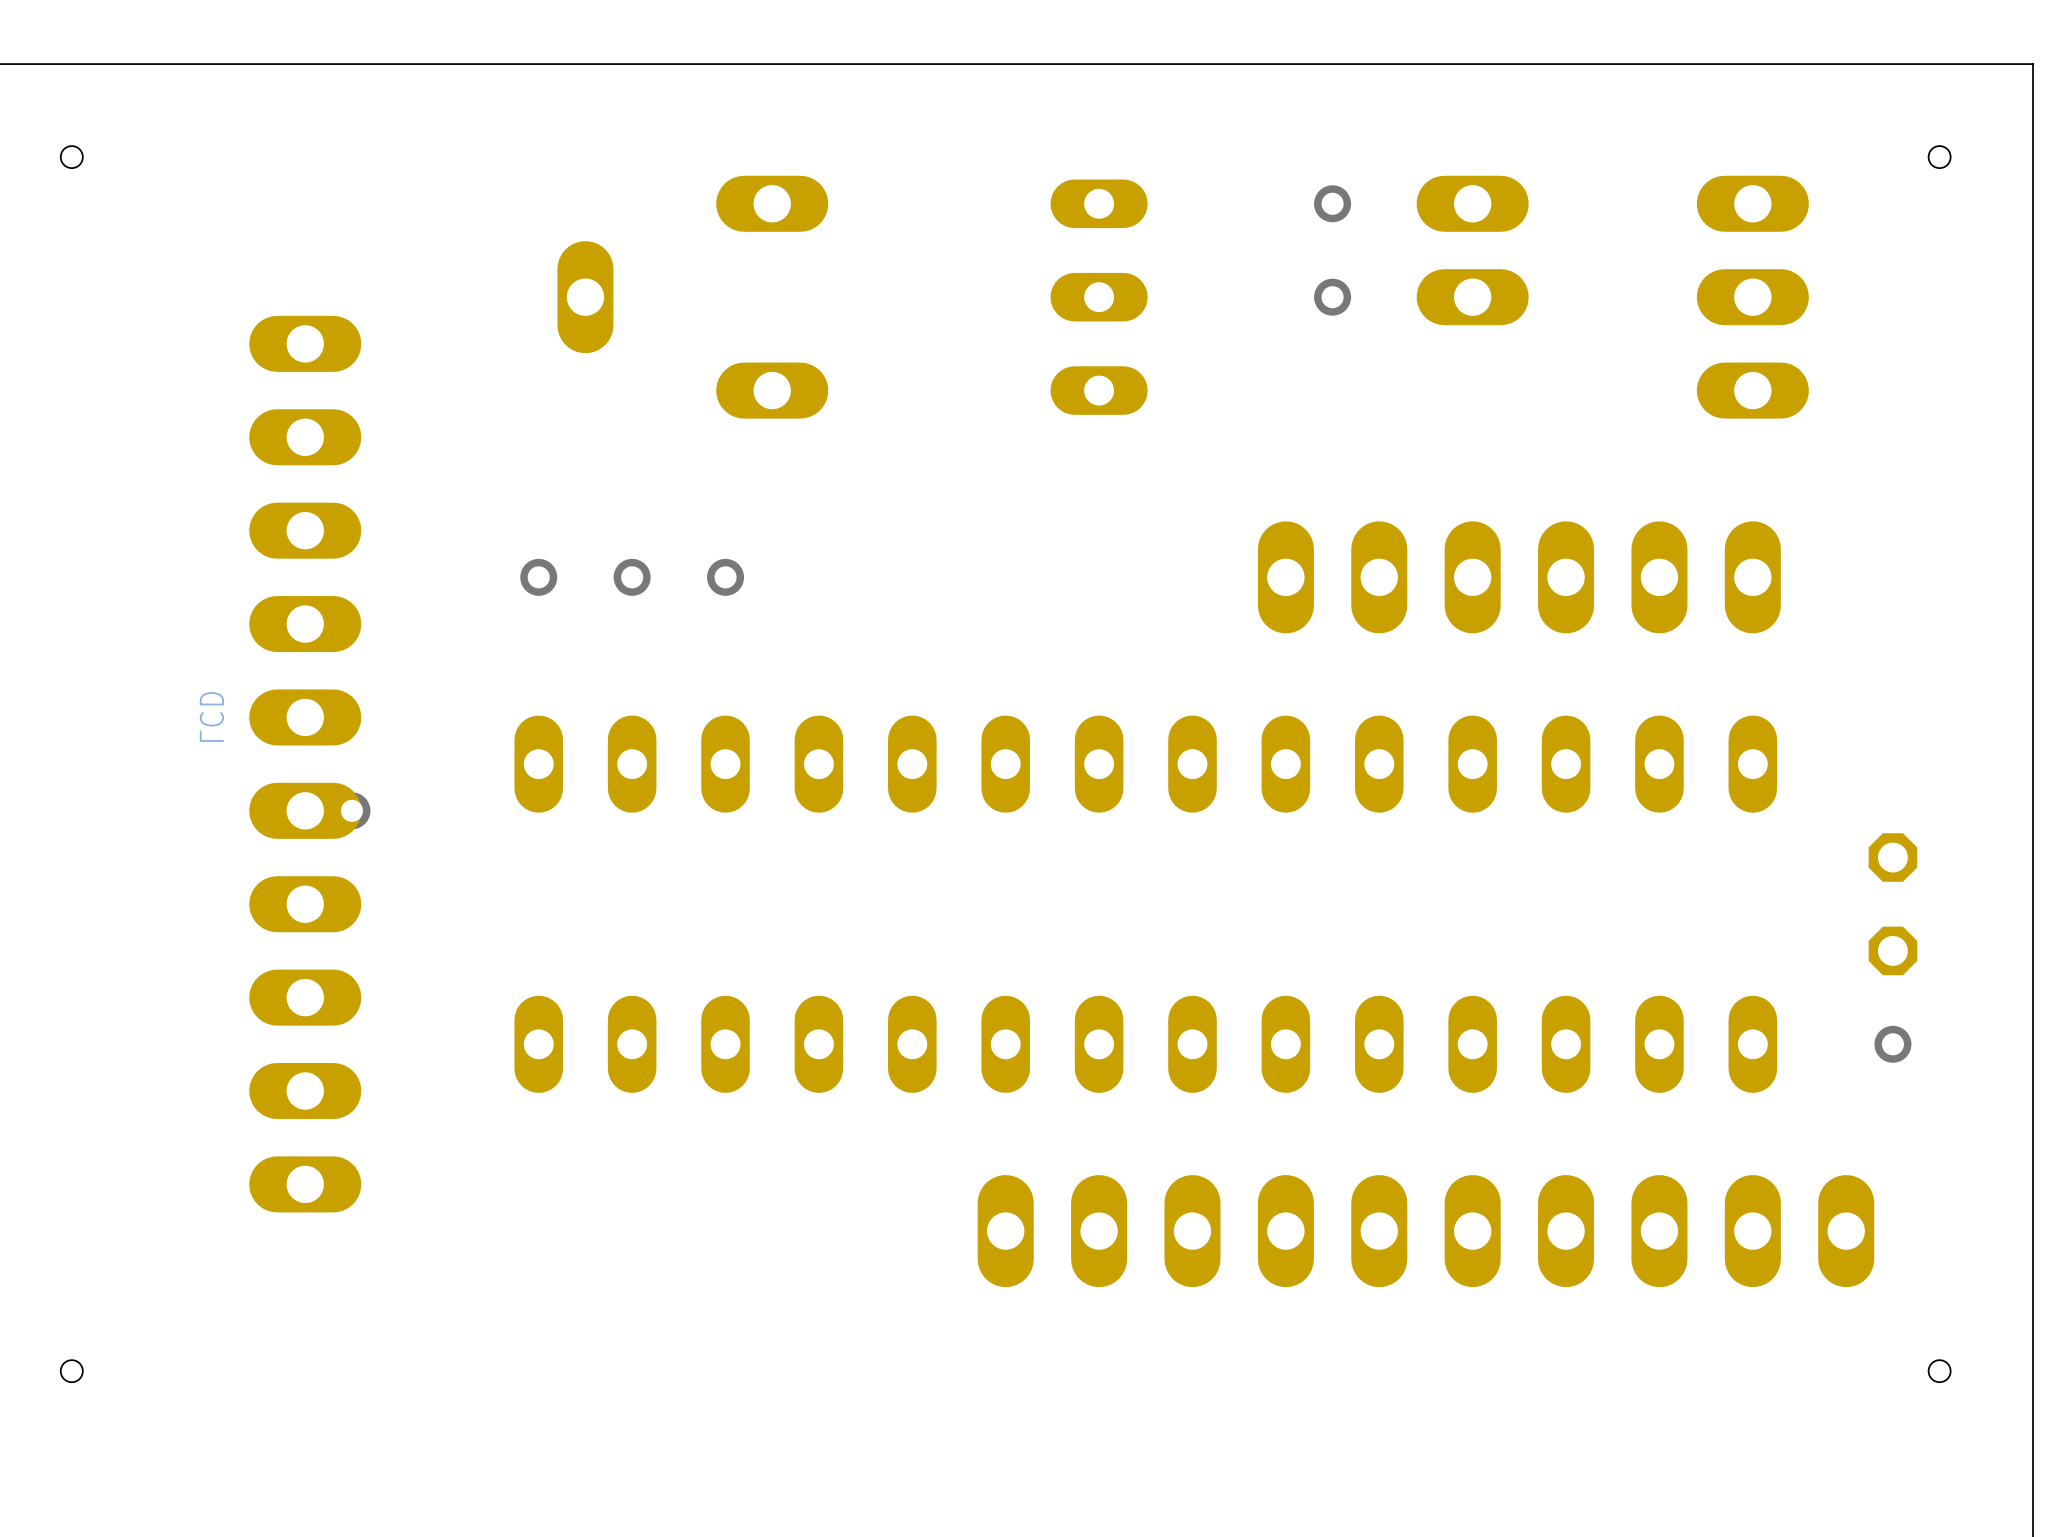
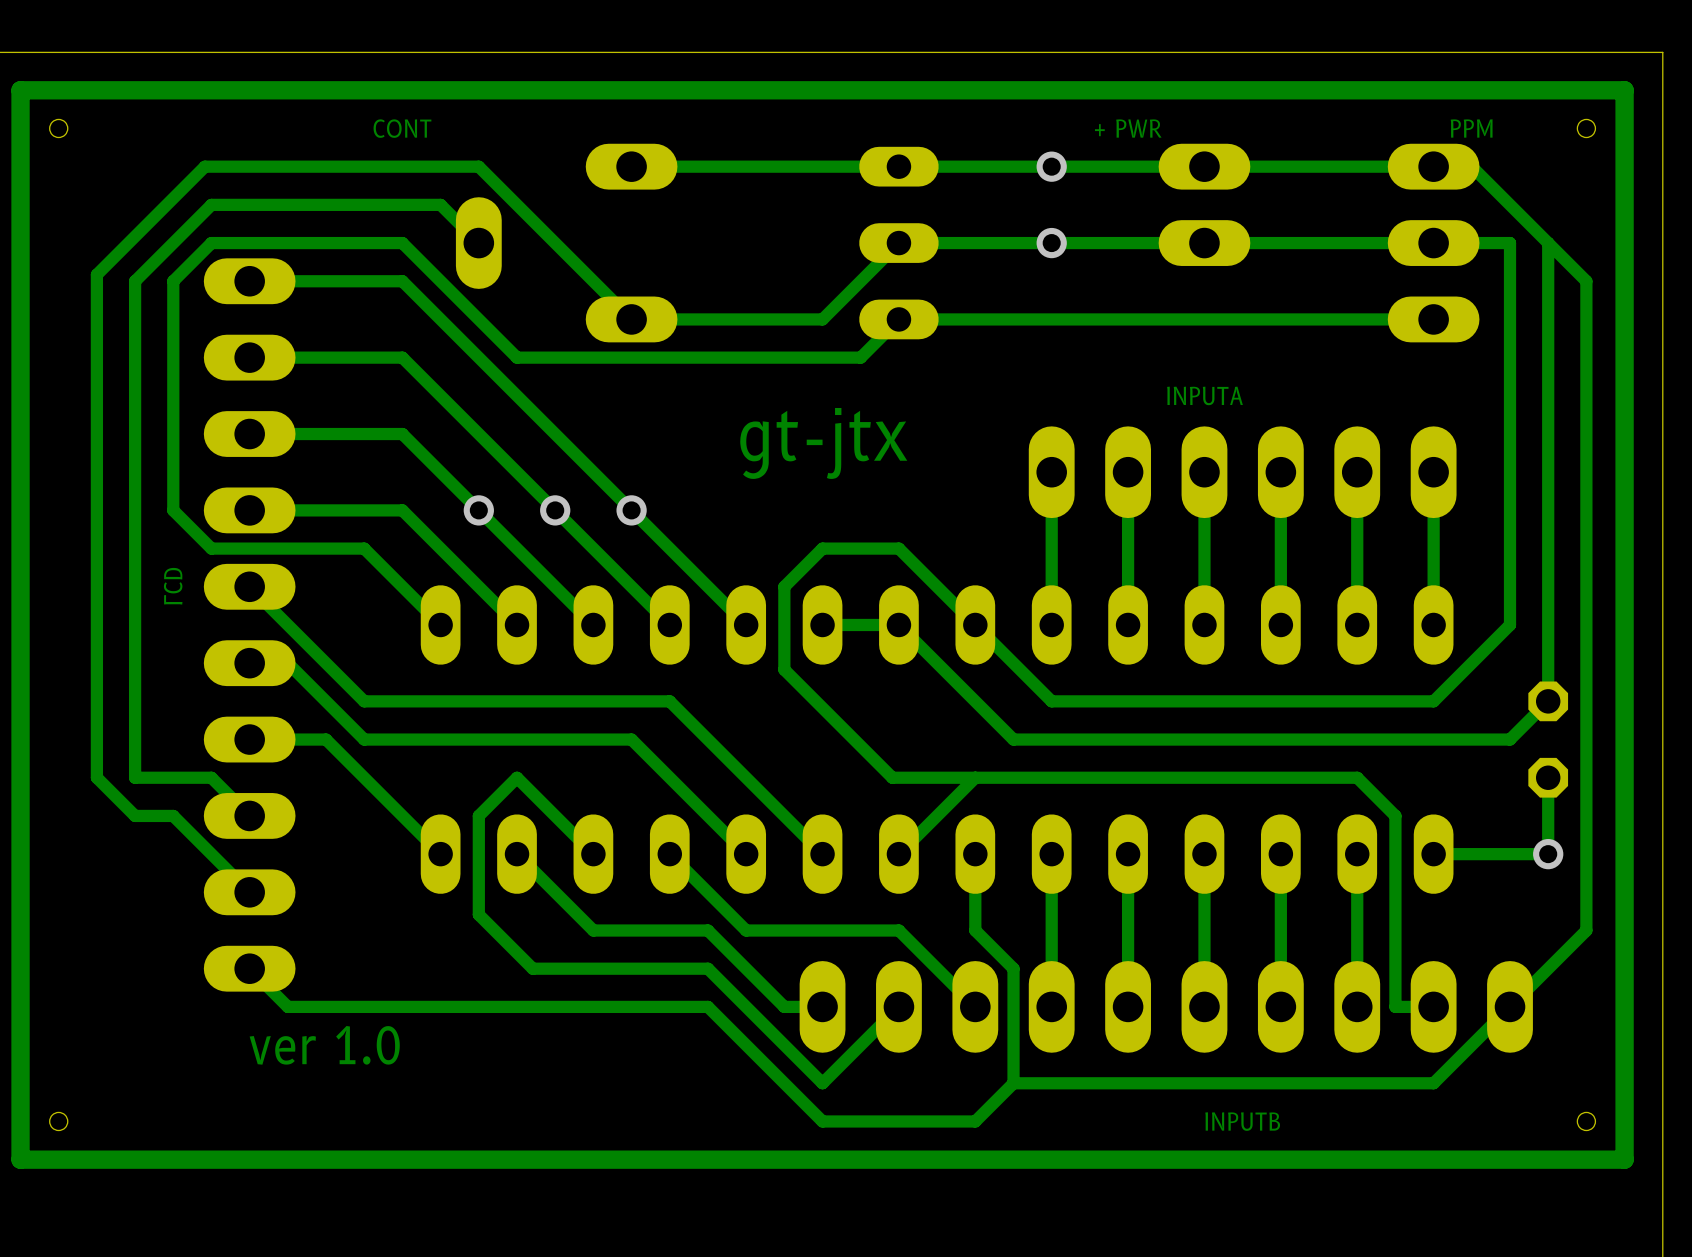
track: none -> (1624, 90) (1624, 1159) (20, 1159) (20, 90) (1624, 90)
text: none -> CONT (402, 128)
text: none -> + PWR (1128, 128)
text: none -> PPM (1471, 128)
track: none -> (631, 166) (1471, 166) (1586, 281) (1586, 930) (1433, 1083) (1013, 1083)
via position: (1332, 203) -> (1051, 166)
track: none -> (478, 243) (440, 204) (211, 204) (135, 281) (135, 777) (211, 777) (249, 815)
via position: (1332, 297) -> (1051, 243)
track: none -> (1548, 243) (1548, 701) (1510, 739) (1013, 739) (898, 624) (822, 624)
track: none -> (249, 281) (402, 281) (746, 624)
track: none -> (1433, 319) (898, 319) (860, 357) (517, 357) (402, 243) (211, 243) (173, 281) (173, 510) (211, 548) (364, 548) (440, 624)
track: none -> (249, 357) (402, 357) (669, 624)
text: none -> INPUTA (1204, 395)
track: none -> (249, 434) (402, 434) (593, 624)
text: none -> gt-jtx (823, 443)
via: (538, 577) -> none
via: (632, 577) -> none
via: (725, 577) -> none
track: none -> (1051, 472) (1051, 624)
track: none -> (1128, 472) (1128, 624)
track: none -> (1204, 472) (1204, 624)
track: none -> (1280, 472) (1280, 624)
track: none -> (1357, 472) (1357, 624)
track: none -> (1433, 472) (1433, 624)
track: none -> (249, 510) (402, 510) (517, 624)
via: none -> (478, 510)
via: none -> (555, 510)
via: none -> (631, 510)
track: none -> (249, 586) (364, 701) (669, 701) (822, 854)
track: none -> (287, 663) (364, 739) (631, 739) (746, 854)
via: (351, 810) -> none
track: none -> (249, 739) (326, 739) (440, 854)
track: none -> (975, 777) (898, 854)
track: none -> (1548, 777) (1548, 854) (1433, 854)
track: none -> (517, 854) (593, 930) (707, 930) (784, 1006) (822, 1006)
track: none -> (593, 854) (517, 777) (478, 815) (478, 914) (532, 968) (707, 968) (822, 1083) (898, 1006)
track: none -> (669, 854) (746, 930) (898, 930) (975, 1006)
track: none -> (975, 854) (975, 930) (1013, 968) (1013, 1083)
track: none -> (1051, 854) (1051, 1006)
track: none -> (1128, 854) (1128, 1006)
track: none -> (1204, 854) (1204, 1006)
track: none -> (1280, 854) (1280, 1006)
track: none -> (1357, 854) (1357, 1006)
track: none -> (249, 892) (173, 815) (135, 815) (96, 777) (96, 274) (204, 166) (478, 166) (631, 319) (822, 319) (898, 243) (1510, 243) (1510, 624) (1433, 701) (1051, 701) (898, 548) (822, 548) (784, 586) (784, 669) (892, 777) (1357, 777) (1395, 815) (1395, 1006) (1433, 1006)
track: none -> (249, 968) (287, 1006) (707, 1006) (822, 1121) (975, 1121) (1013, 1083)
text: none -> ver 1.0 (324, 1045)
text: none -> INPUTB (1242, 1121)

